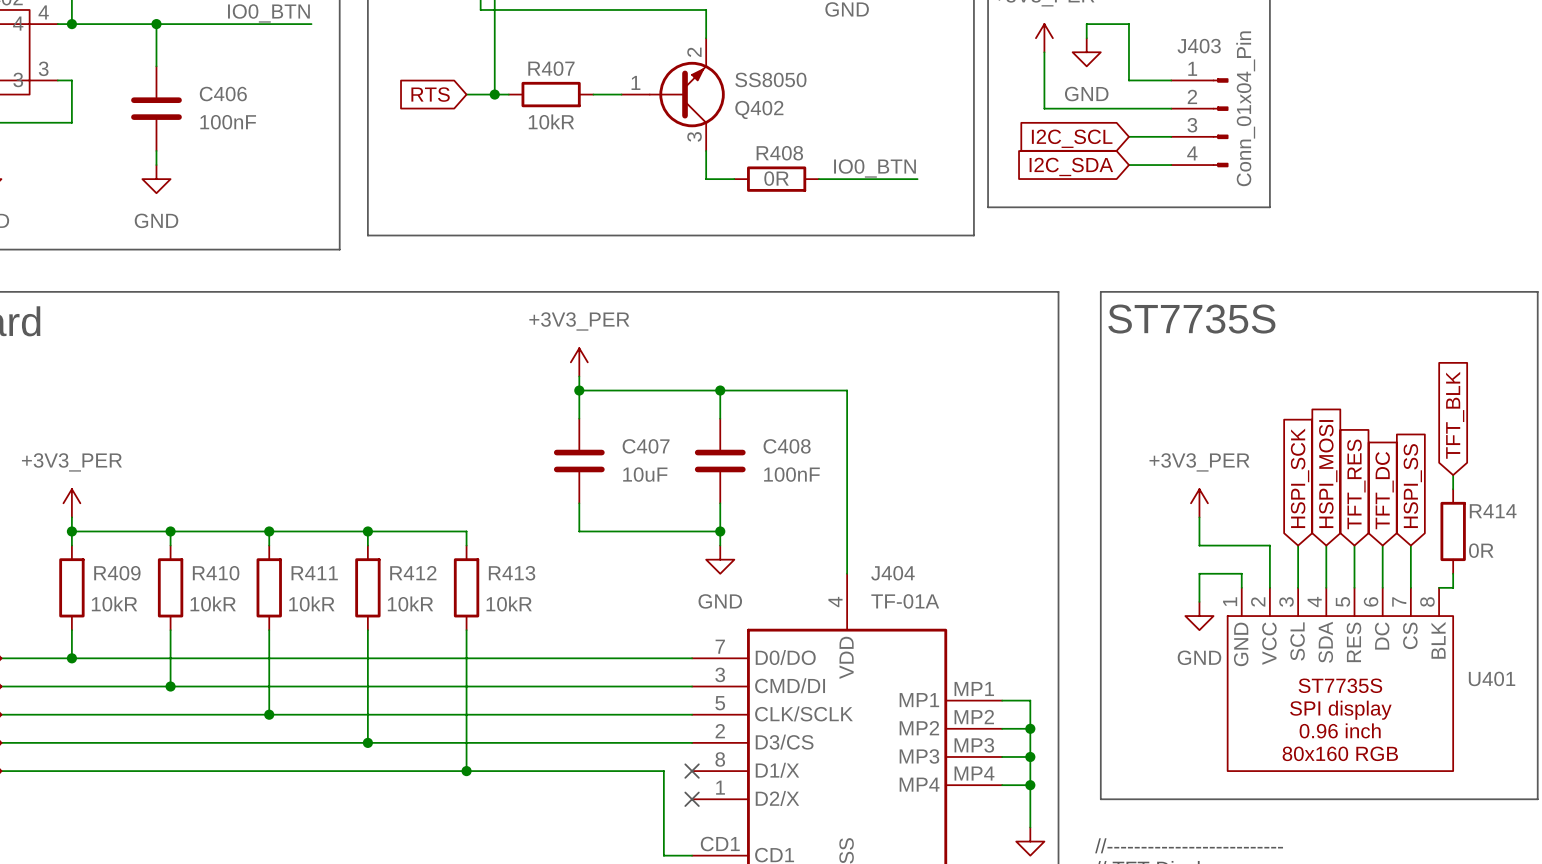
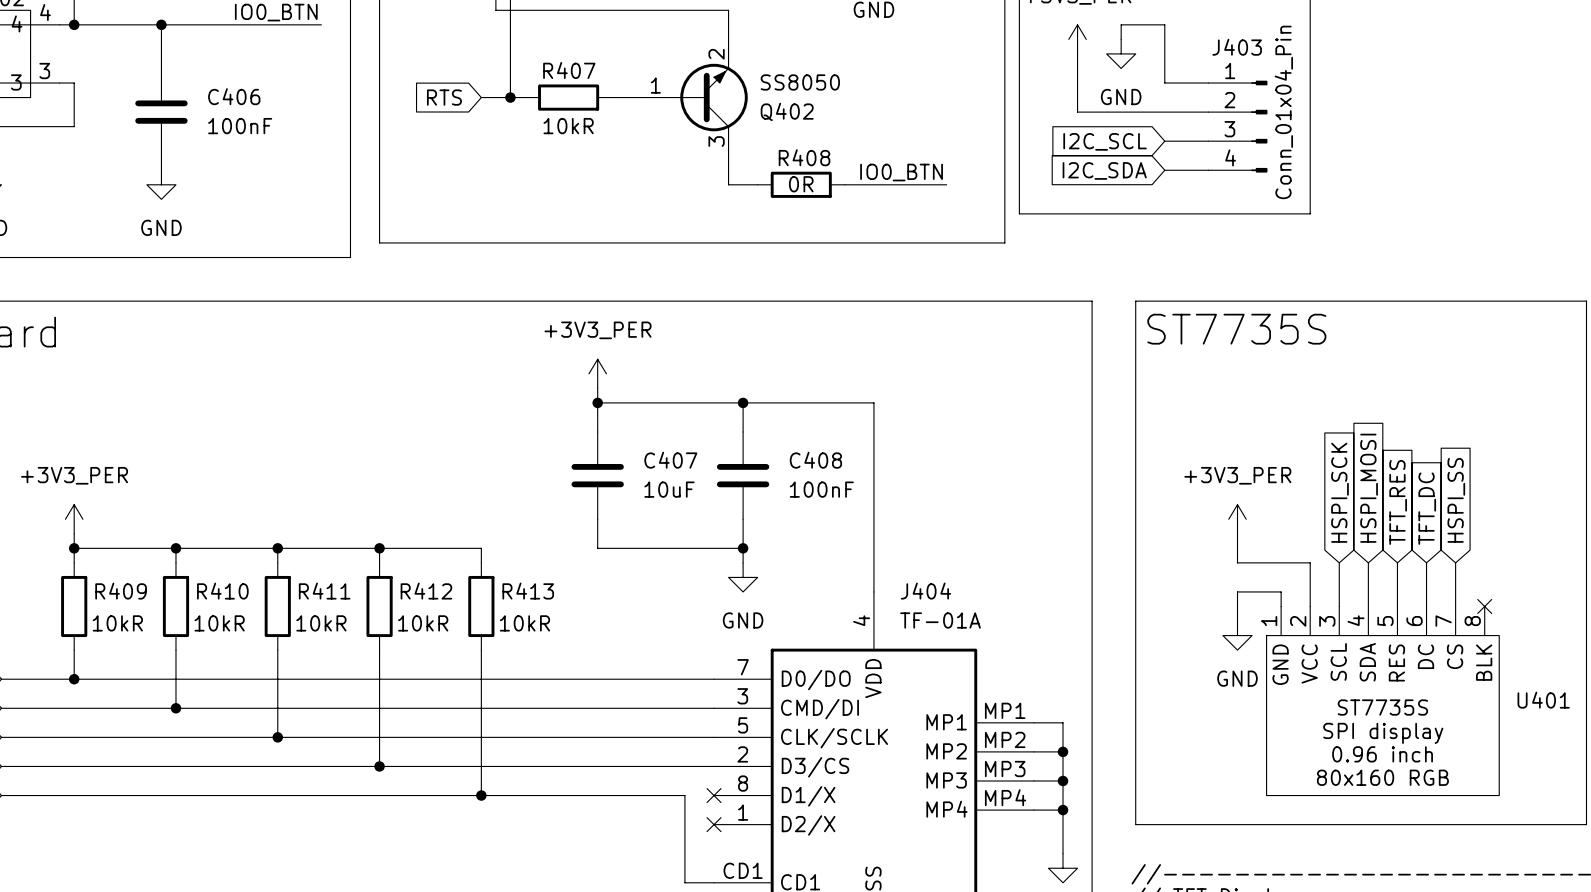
global label: TFT_BLK (1455, 415) -> none
wire: (1453, 475) (1453, 489) -> none
R414: 0R (1453, 531) -> none
wire: (1453, 573) (1453, 587) (1439, 587) -> none
no-connect mark: none -> (1484, 606)

